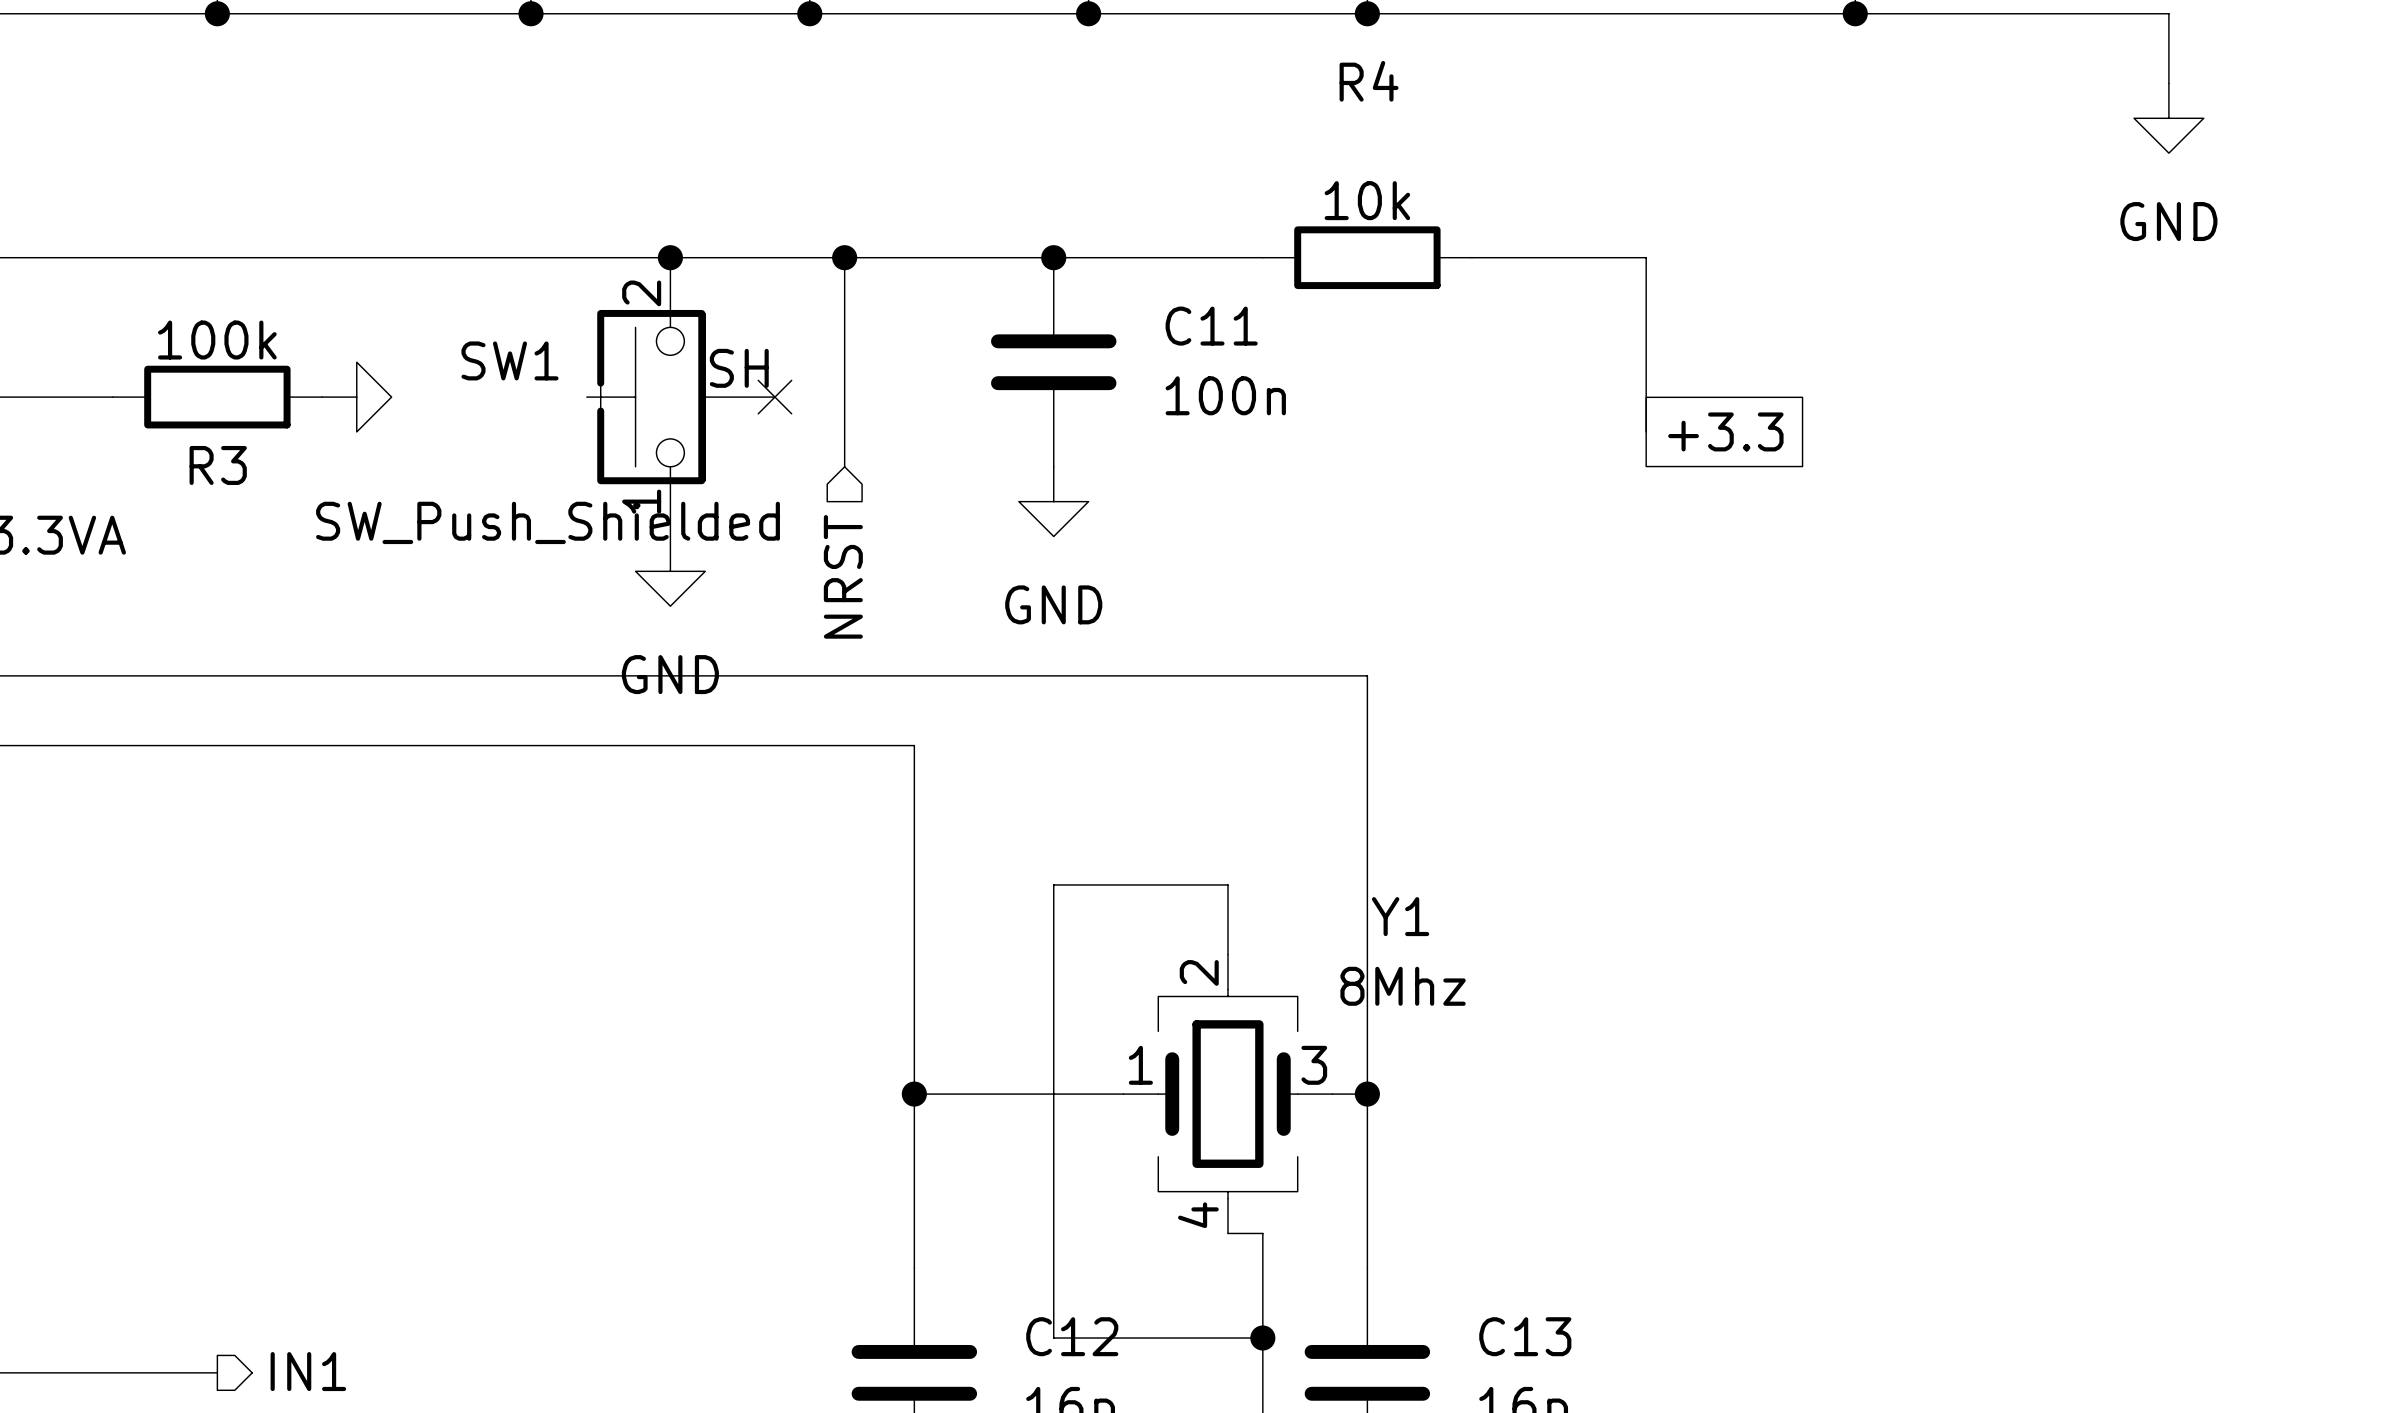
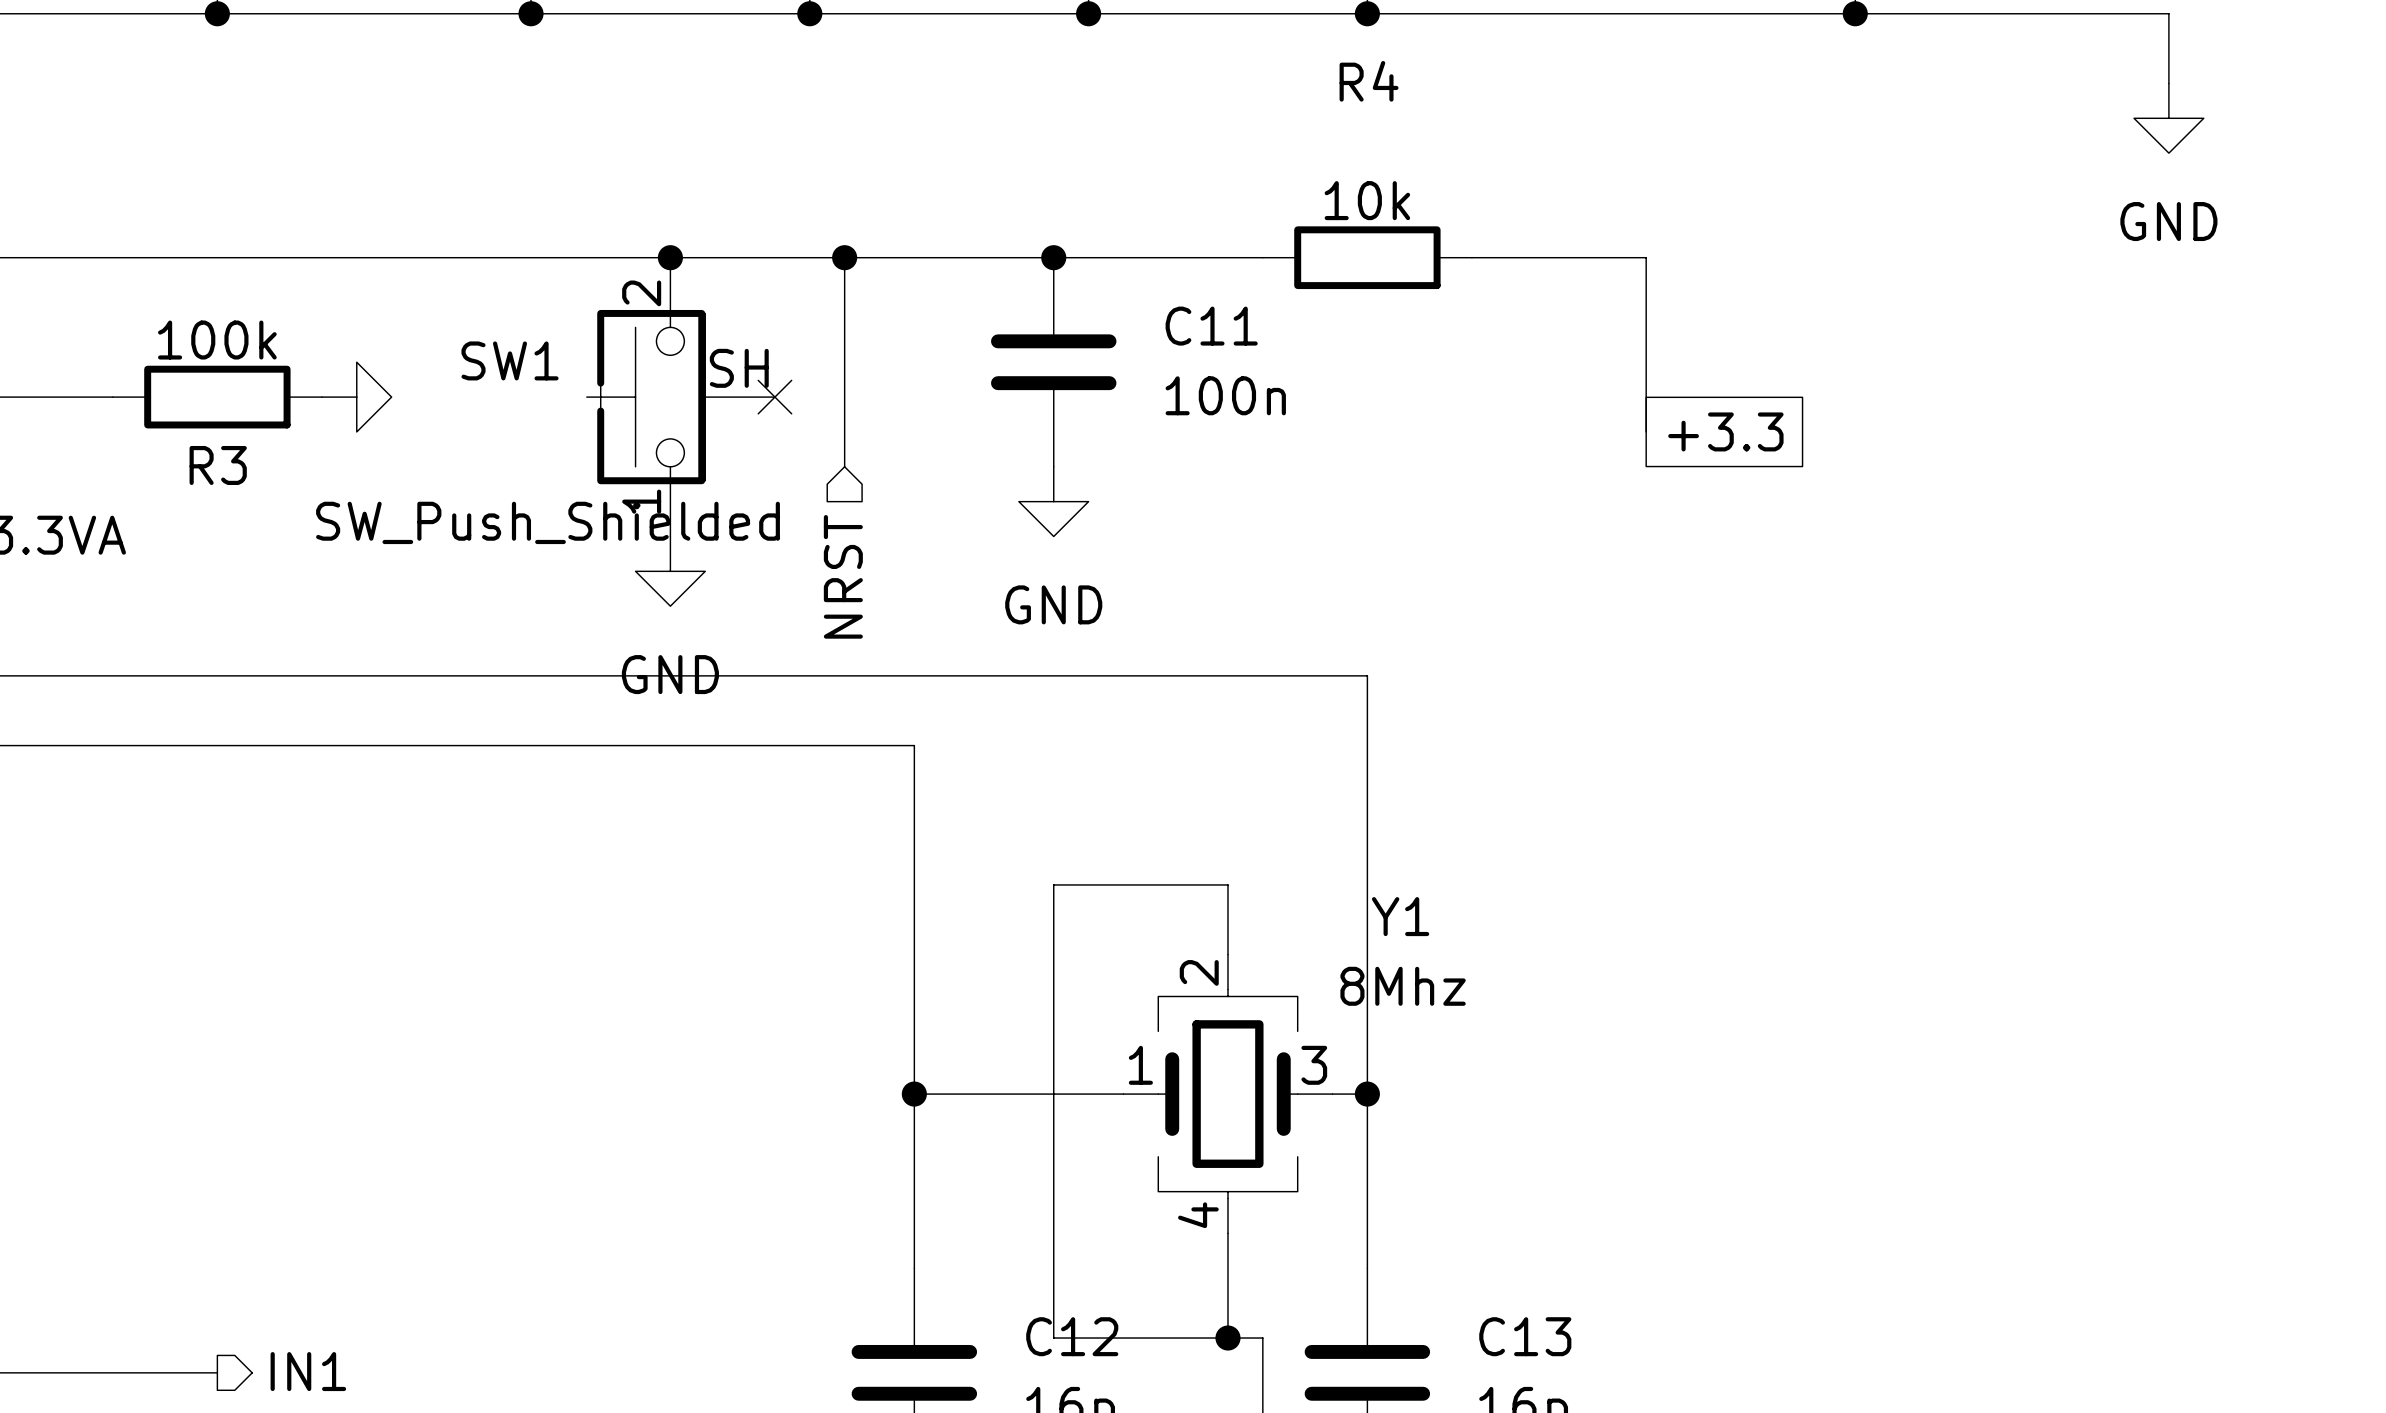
wire: (1227, 1233) (1262, 1233) (1262, 1338) -> (1227, 1233) (1227, 1338)
junction position: (1262, 1338) -> (1227, 1338)

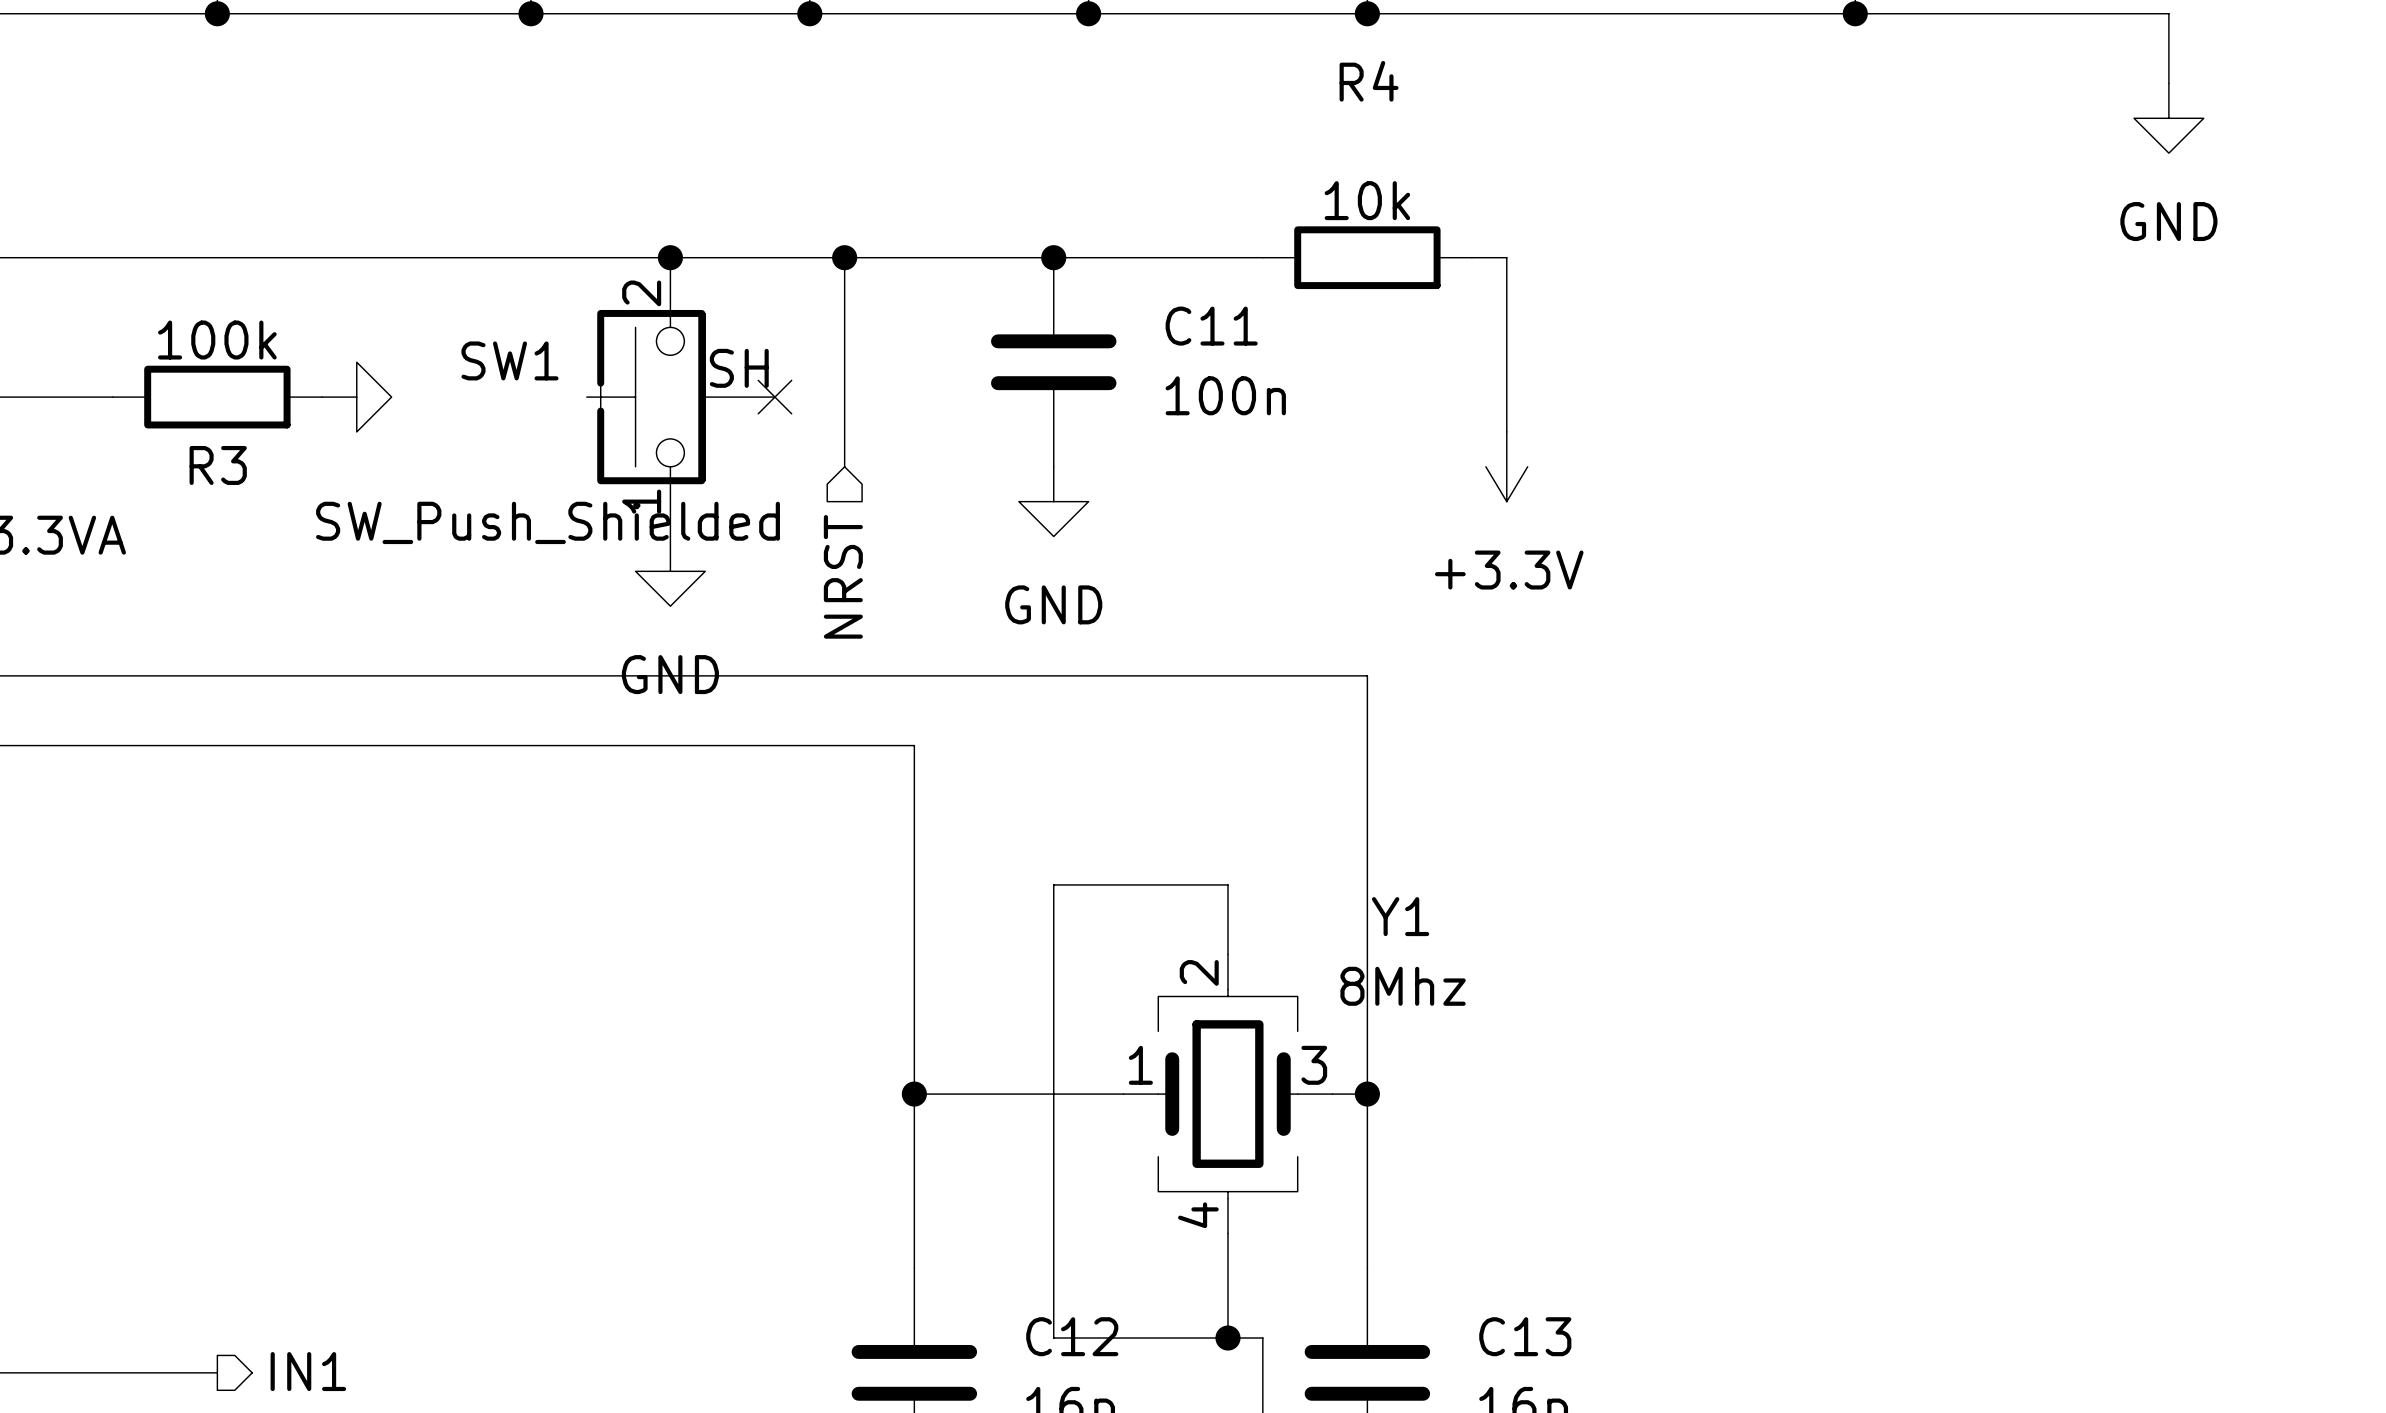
wire: (1506, 257) (1646, 257) (1646, 431) -> (1506, 257) (1506, 431)
global label: +3.3 (1725, 431) -> none
power symbol: none -> +3.3V (1506, 466)

